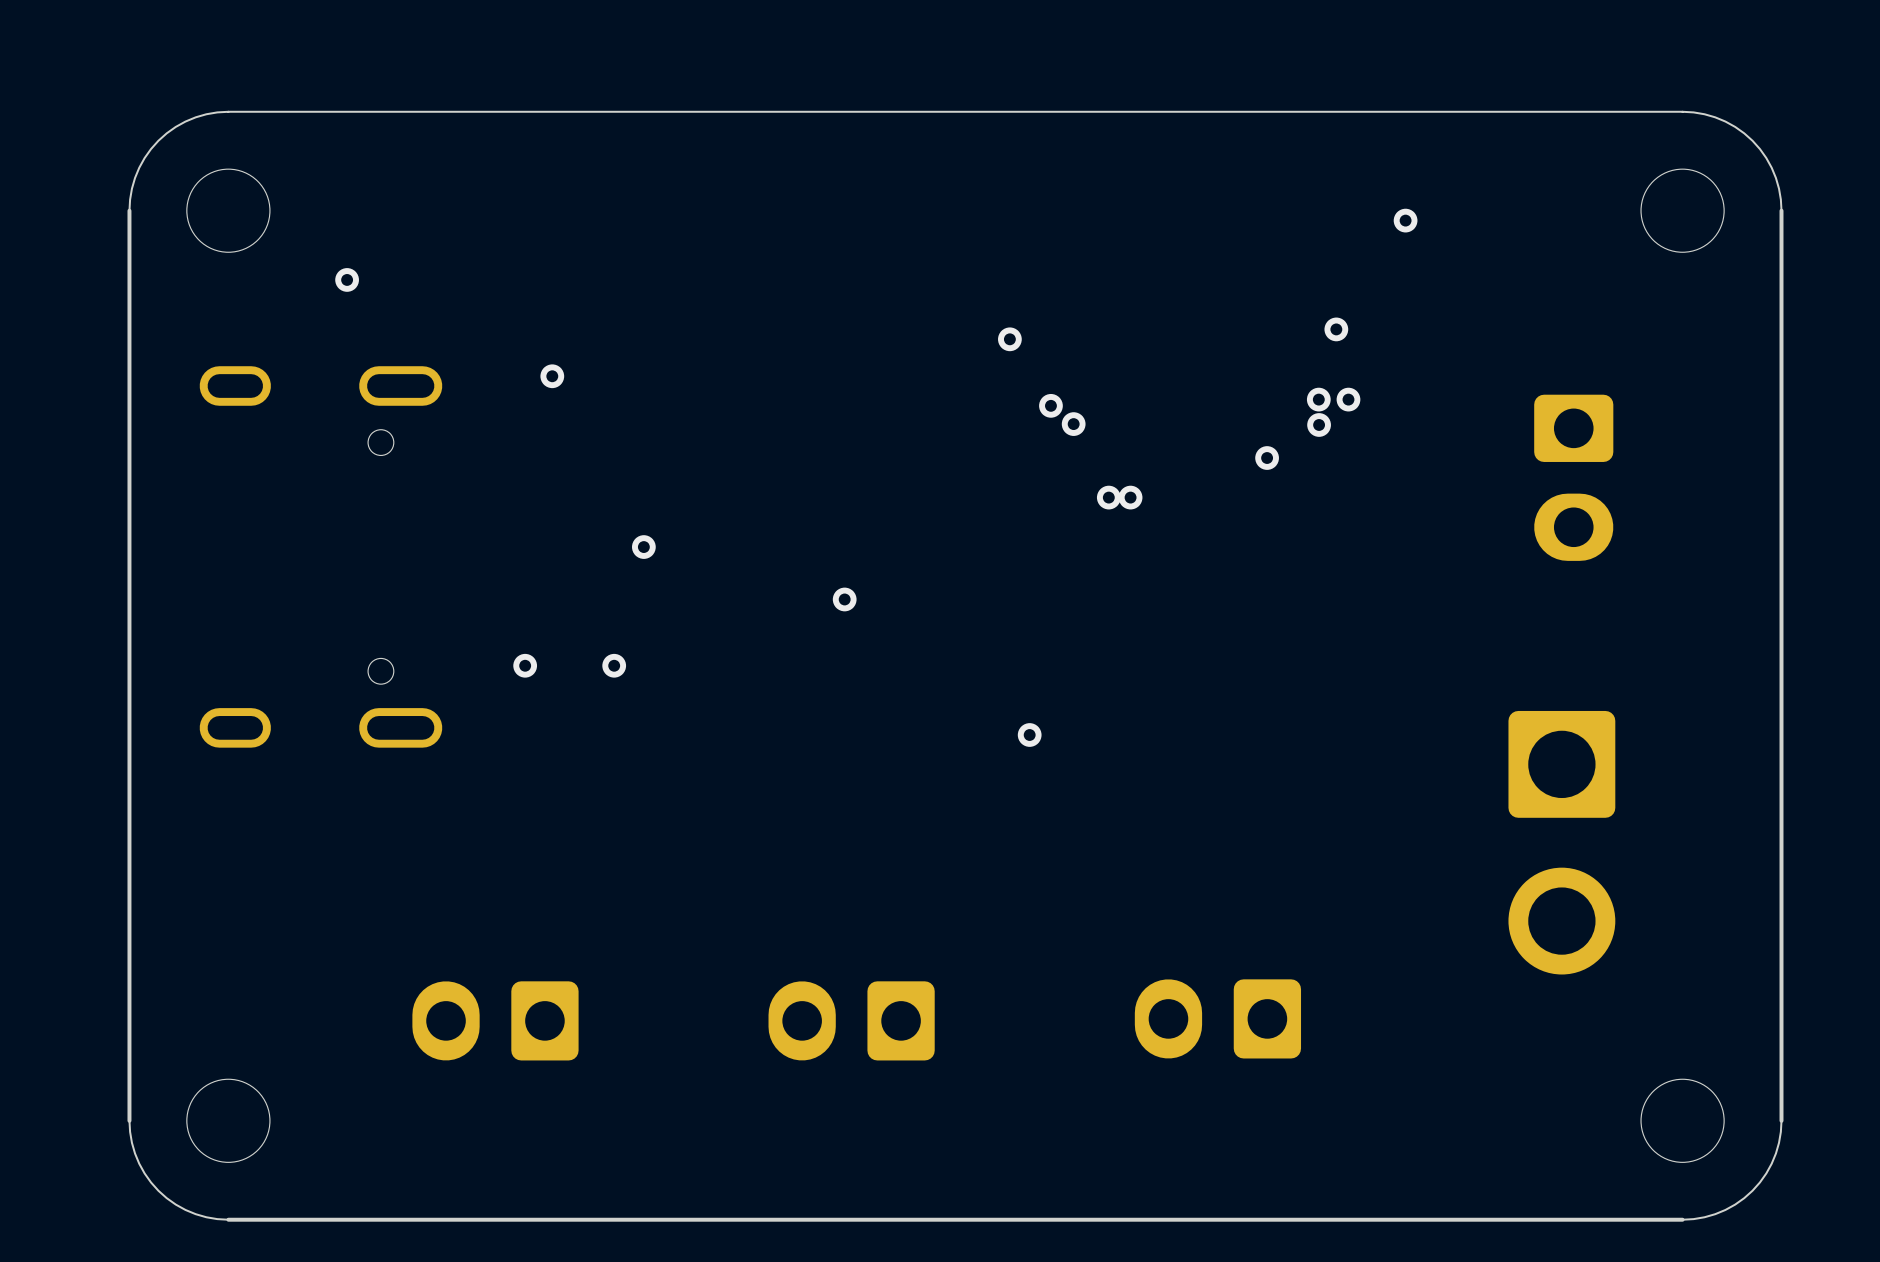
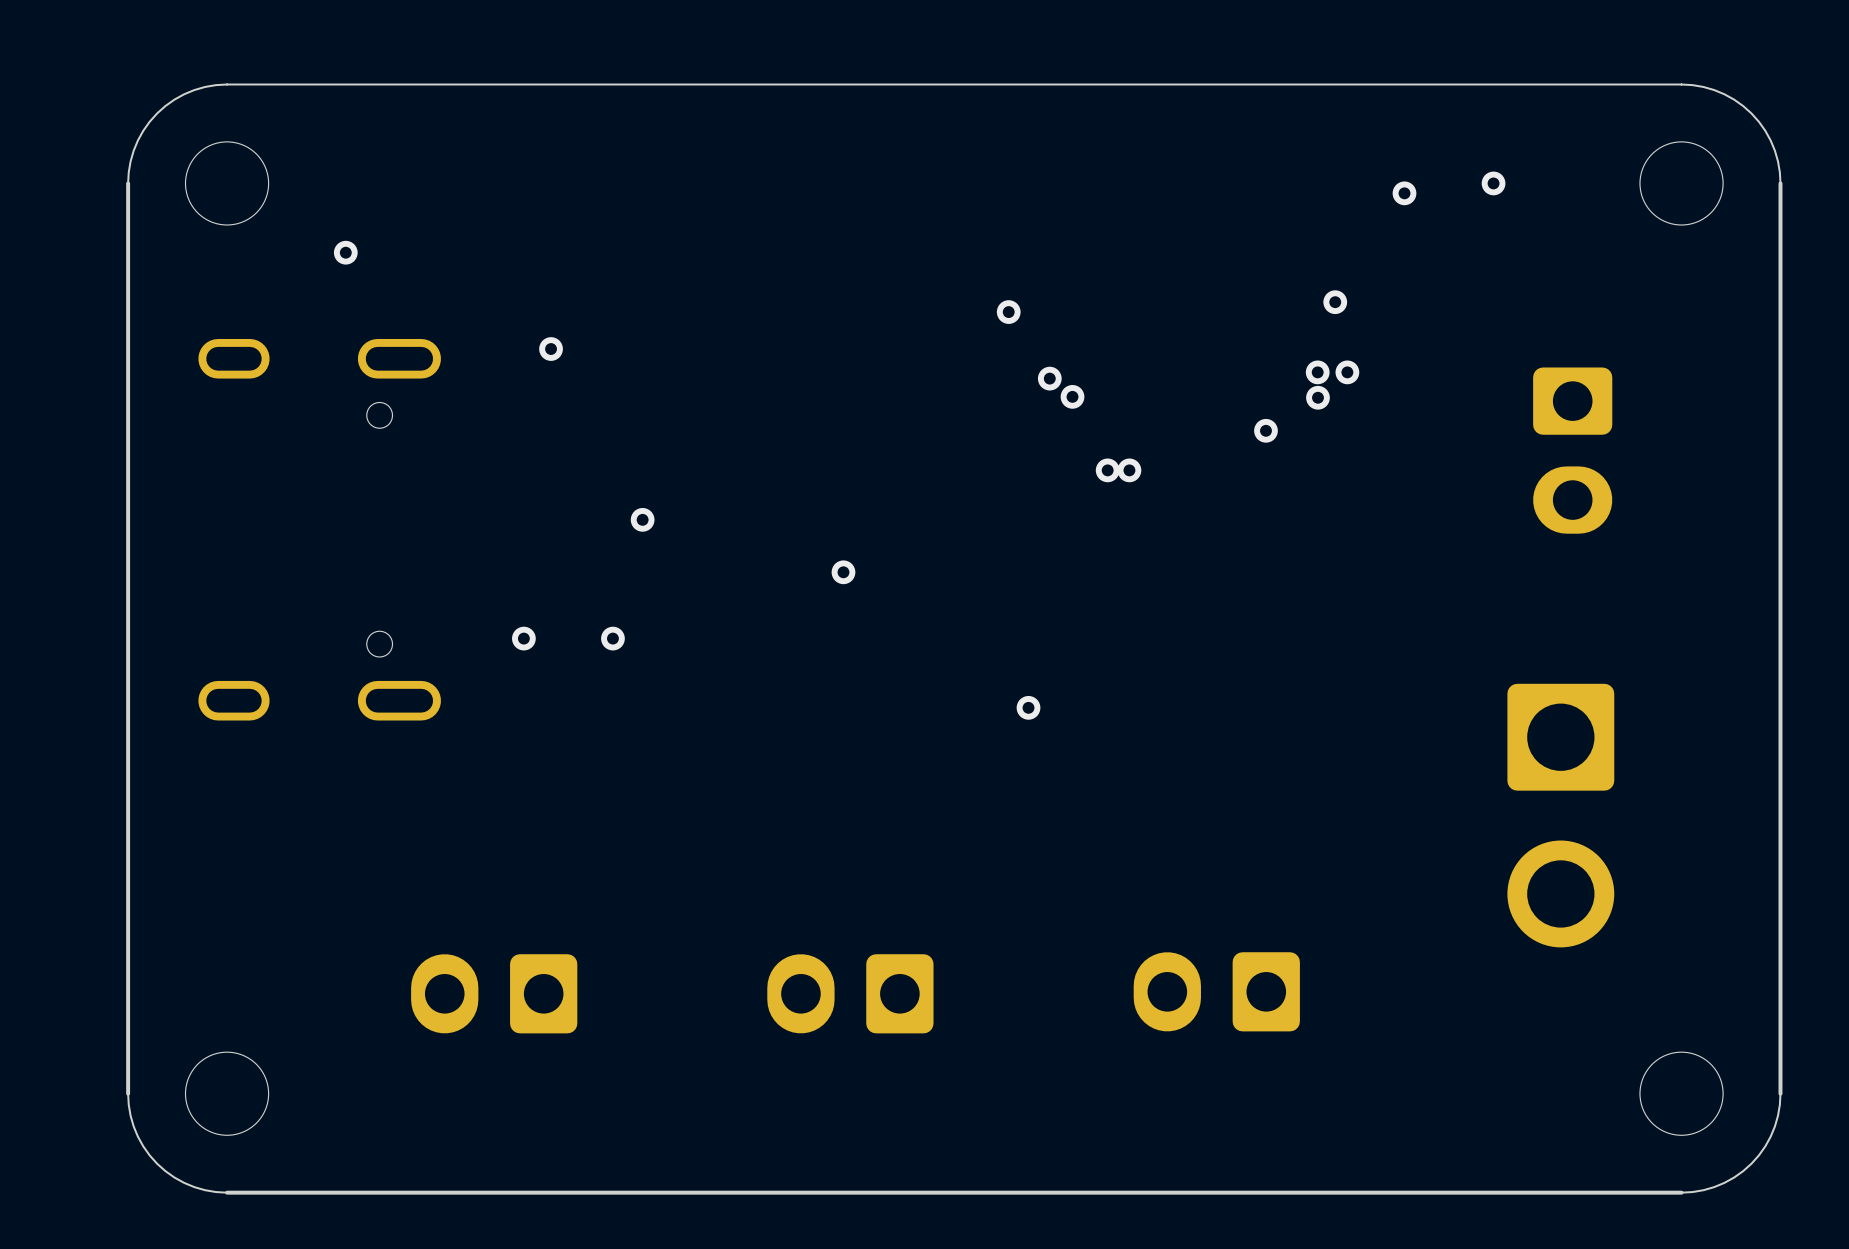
via: none -> (1493, 183)

